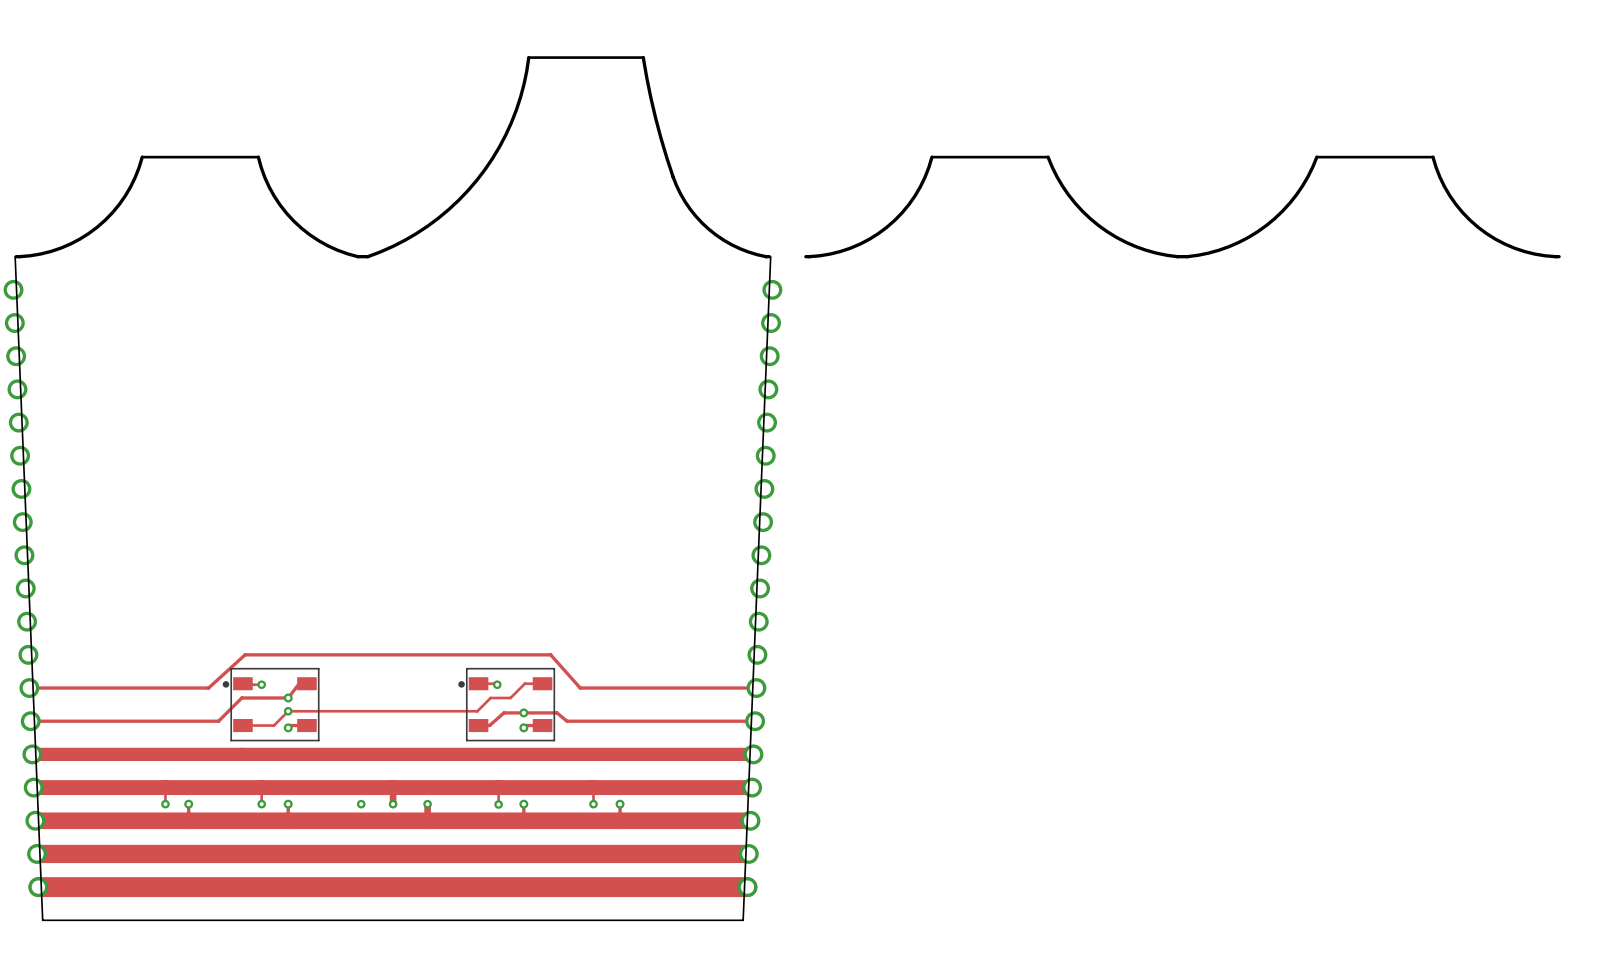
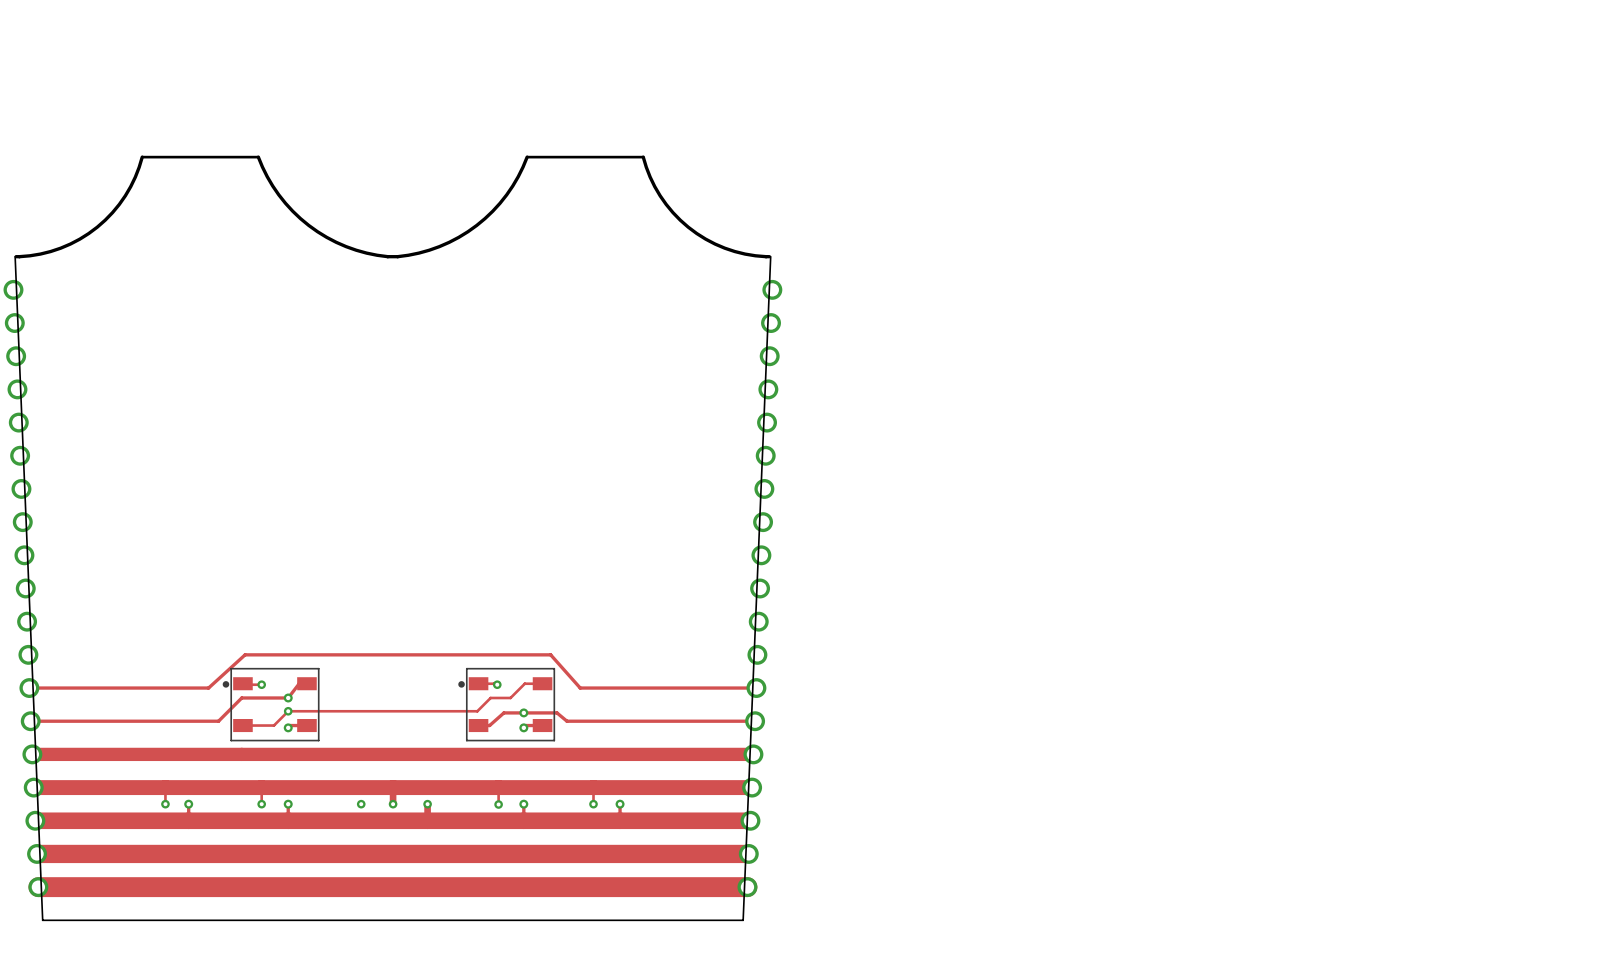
board edge: (258, 157) (264, 177) (274, 196) (286, 213) (301, 228) (318, 240) (337, 250) (357, 256) (367, 256) (392, 246) (427, 226) (458, 200) (476, 180) (492, 158) (511, 122) (520, 97) (528, 57) (643, 57) (660, 137) (673, 177) (685, 201) (702, 223) (723, 240) (739, 248) (766, 256) -> (258, 157) (278, 194) (308, 225) (346, 246) (387, 256) (408, 255) (429, 250) (467, 231) (485, 218) (506, 194) (527, 157) (643, 157) (650, 177) (660, 195) (672, 212) (688, 227) (705, 239) (724, 248) (745, 254) (766, 256)
board edge: (805, 256) (830, 254) (850, 248) (869, 239) (886, 227) (902, 212) (915, 195) (925, 177) (931, 157) (1048, 157) (1068, 194) (1098, 225) (1135, 246) (1177, 256) (1198, 255) (1219, 250) (1257, 231) (1274, 218) (1296, 194) (1316, 157) (1433, 157) (1439, 177) (1449, 195) (1462, 212) (1477, 227) (1495, 239) (1514, 248) (1534, 254) (1559, 256) -> none

